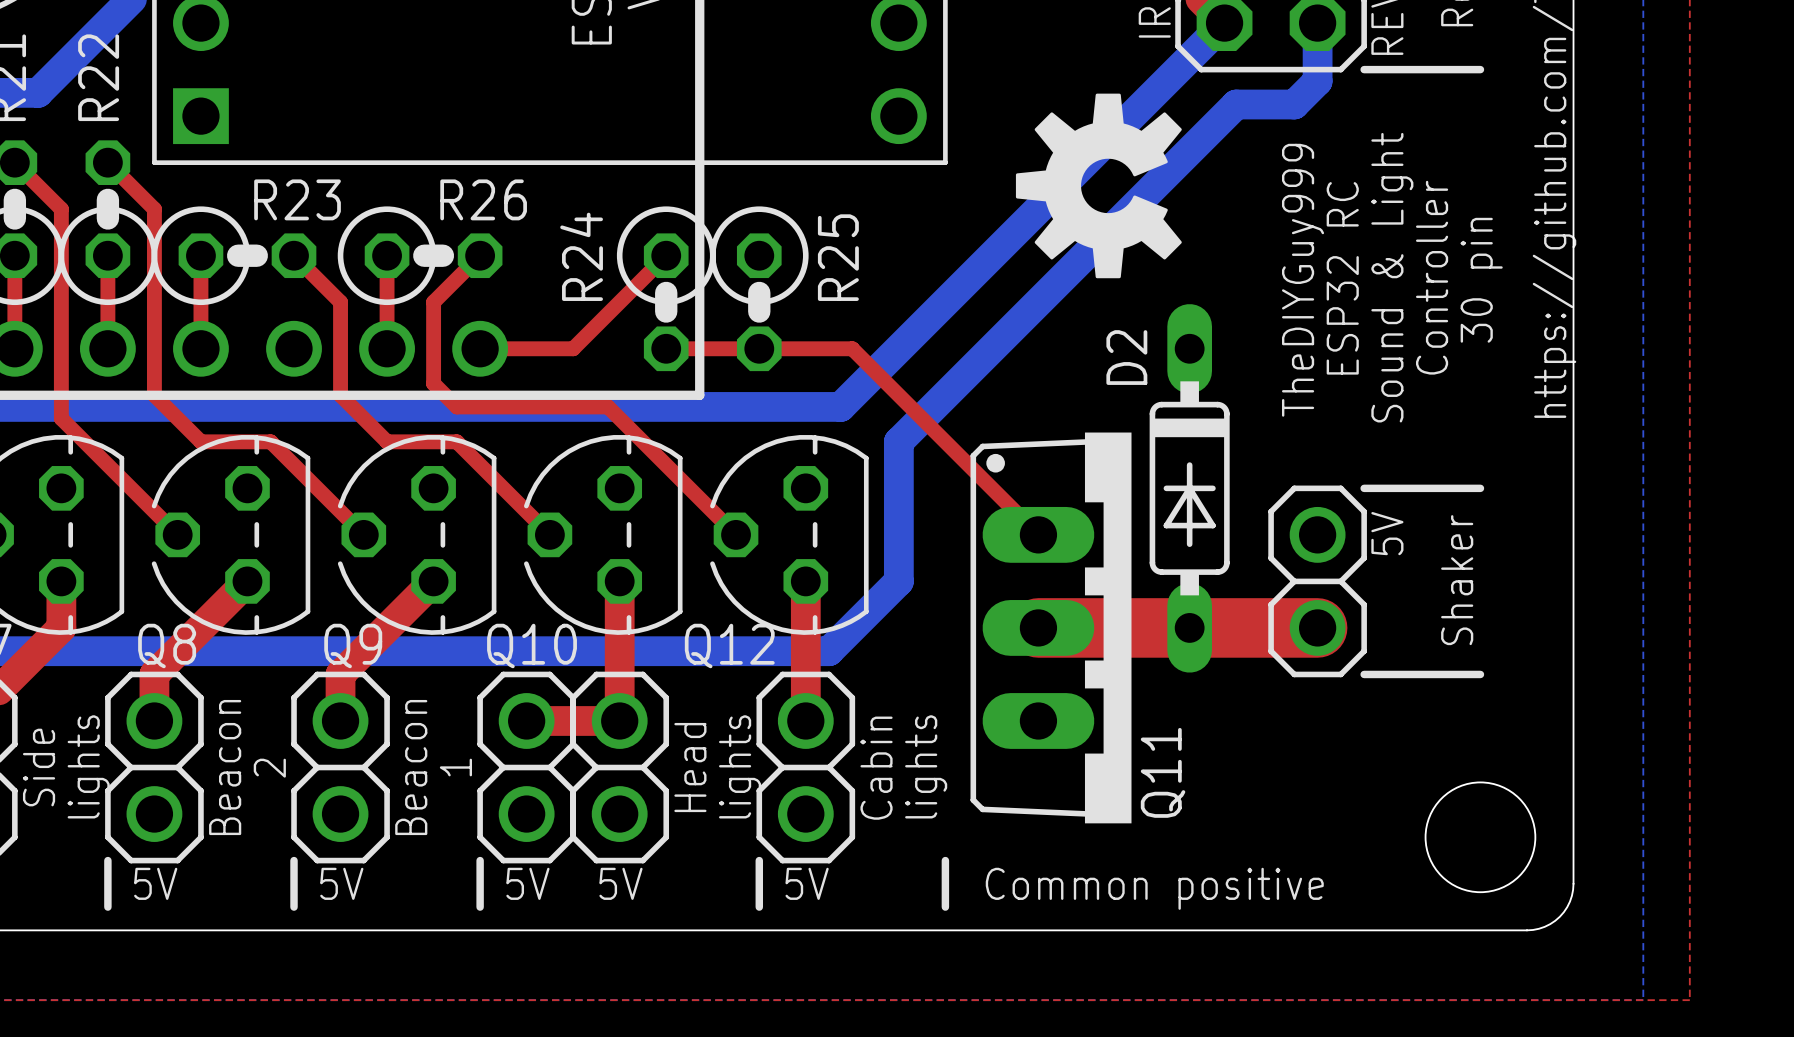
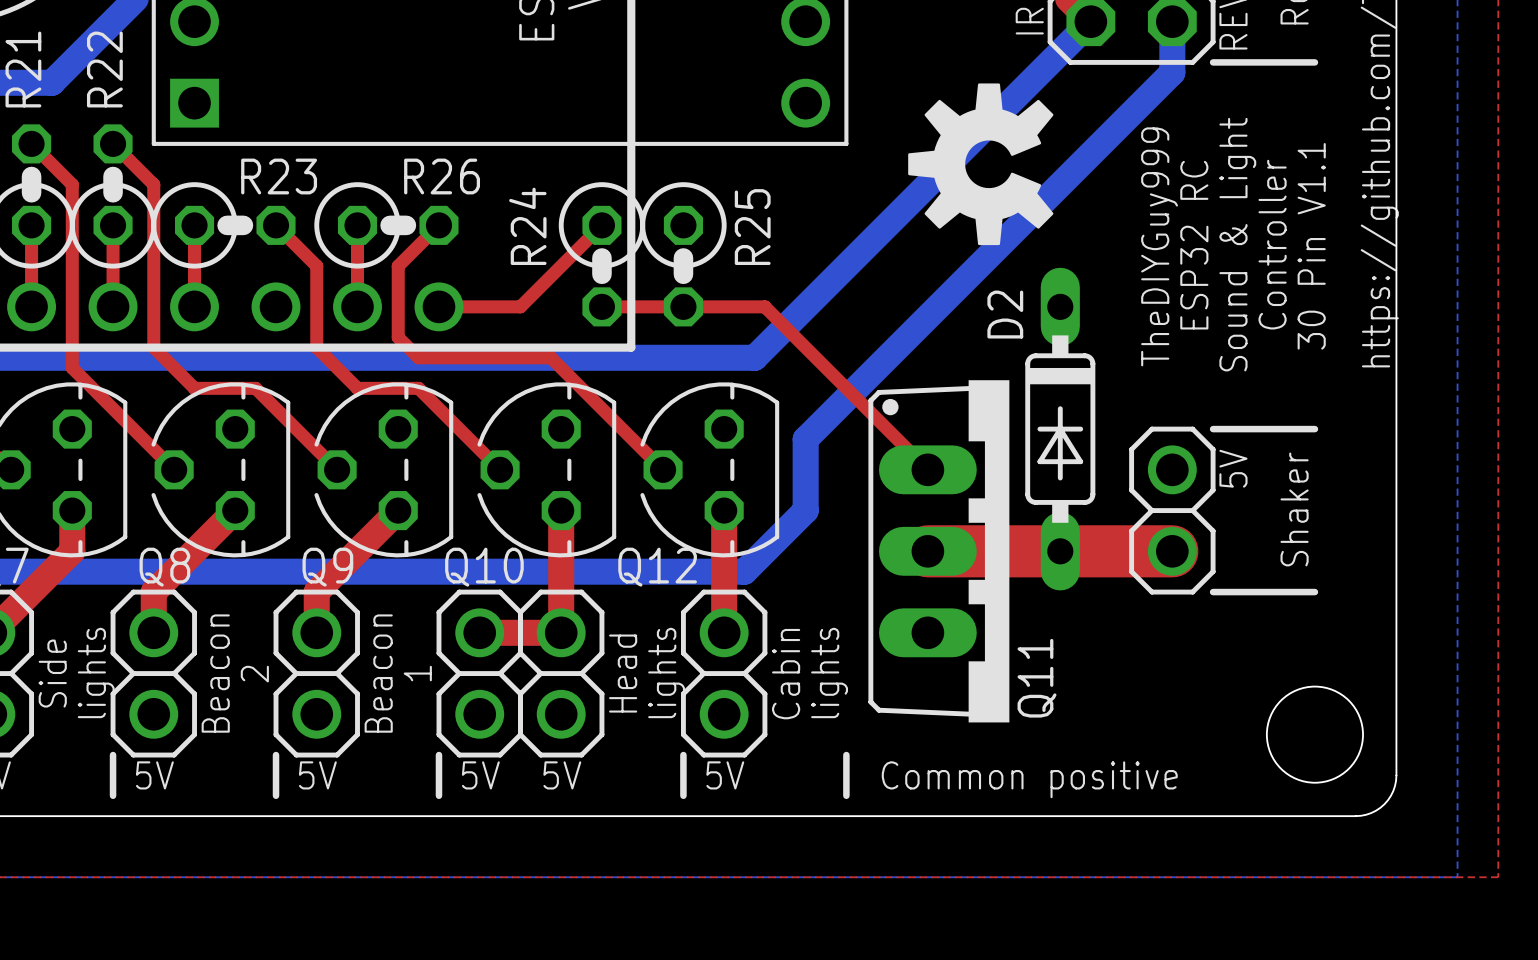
bottom track: (1294, 104) (1236, 104) (898, 441) (898, 499) -> (1151, 92) (805, 439)
text: 30 pin (1481, 280) -> 30 Pin V1.1 (1311, 246)

